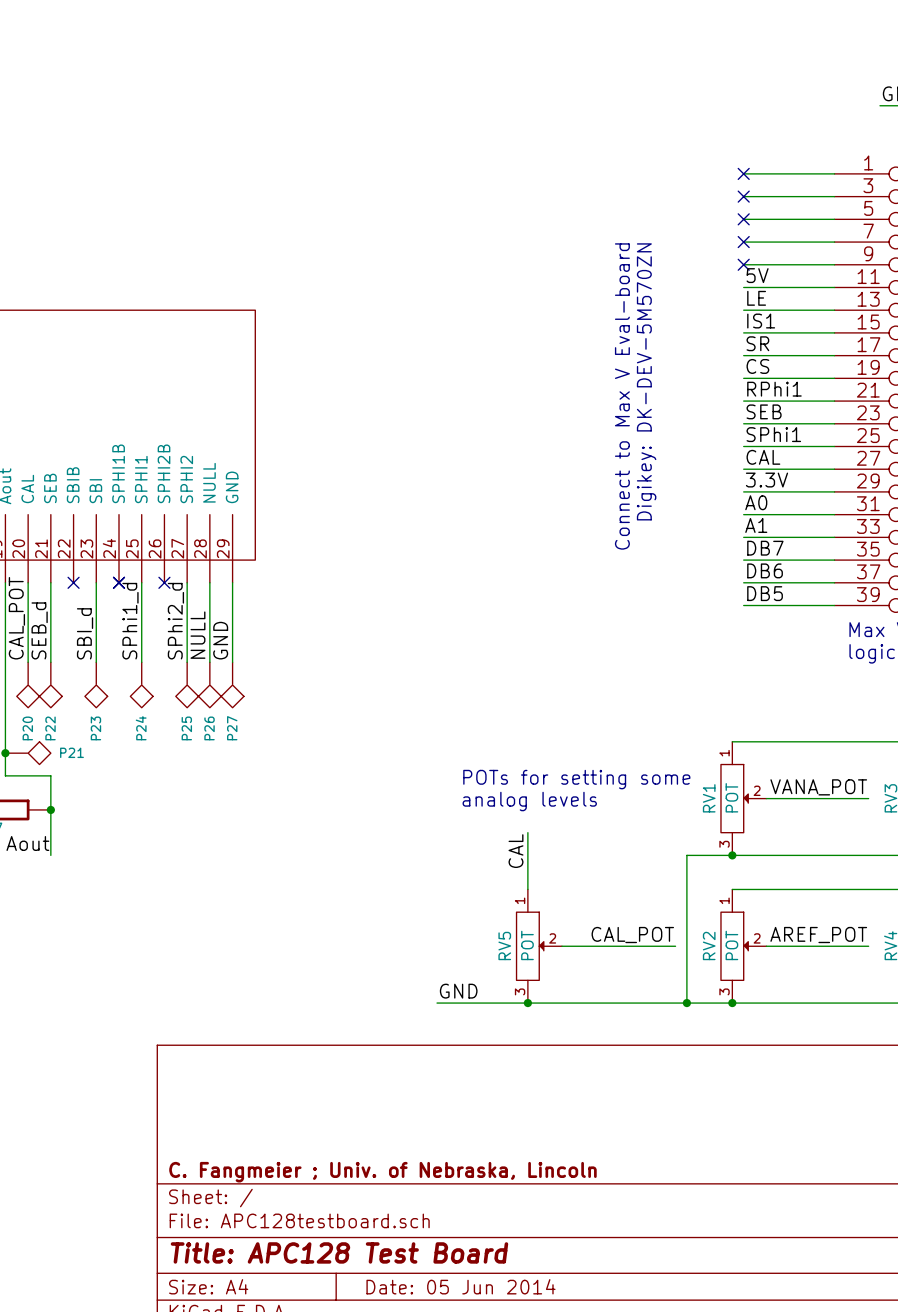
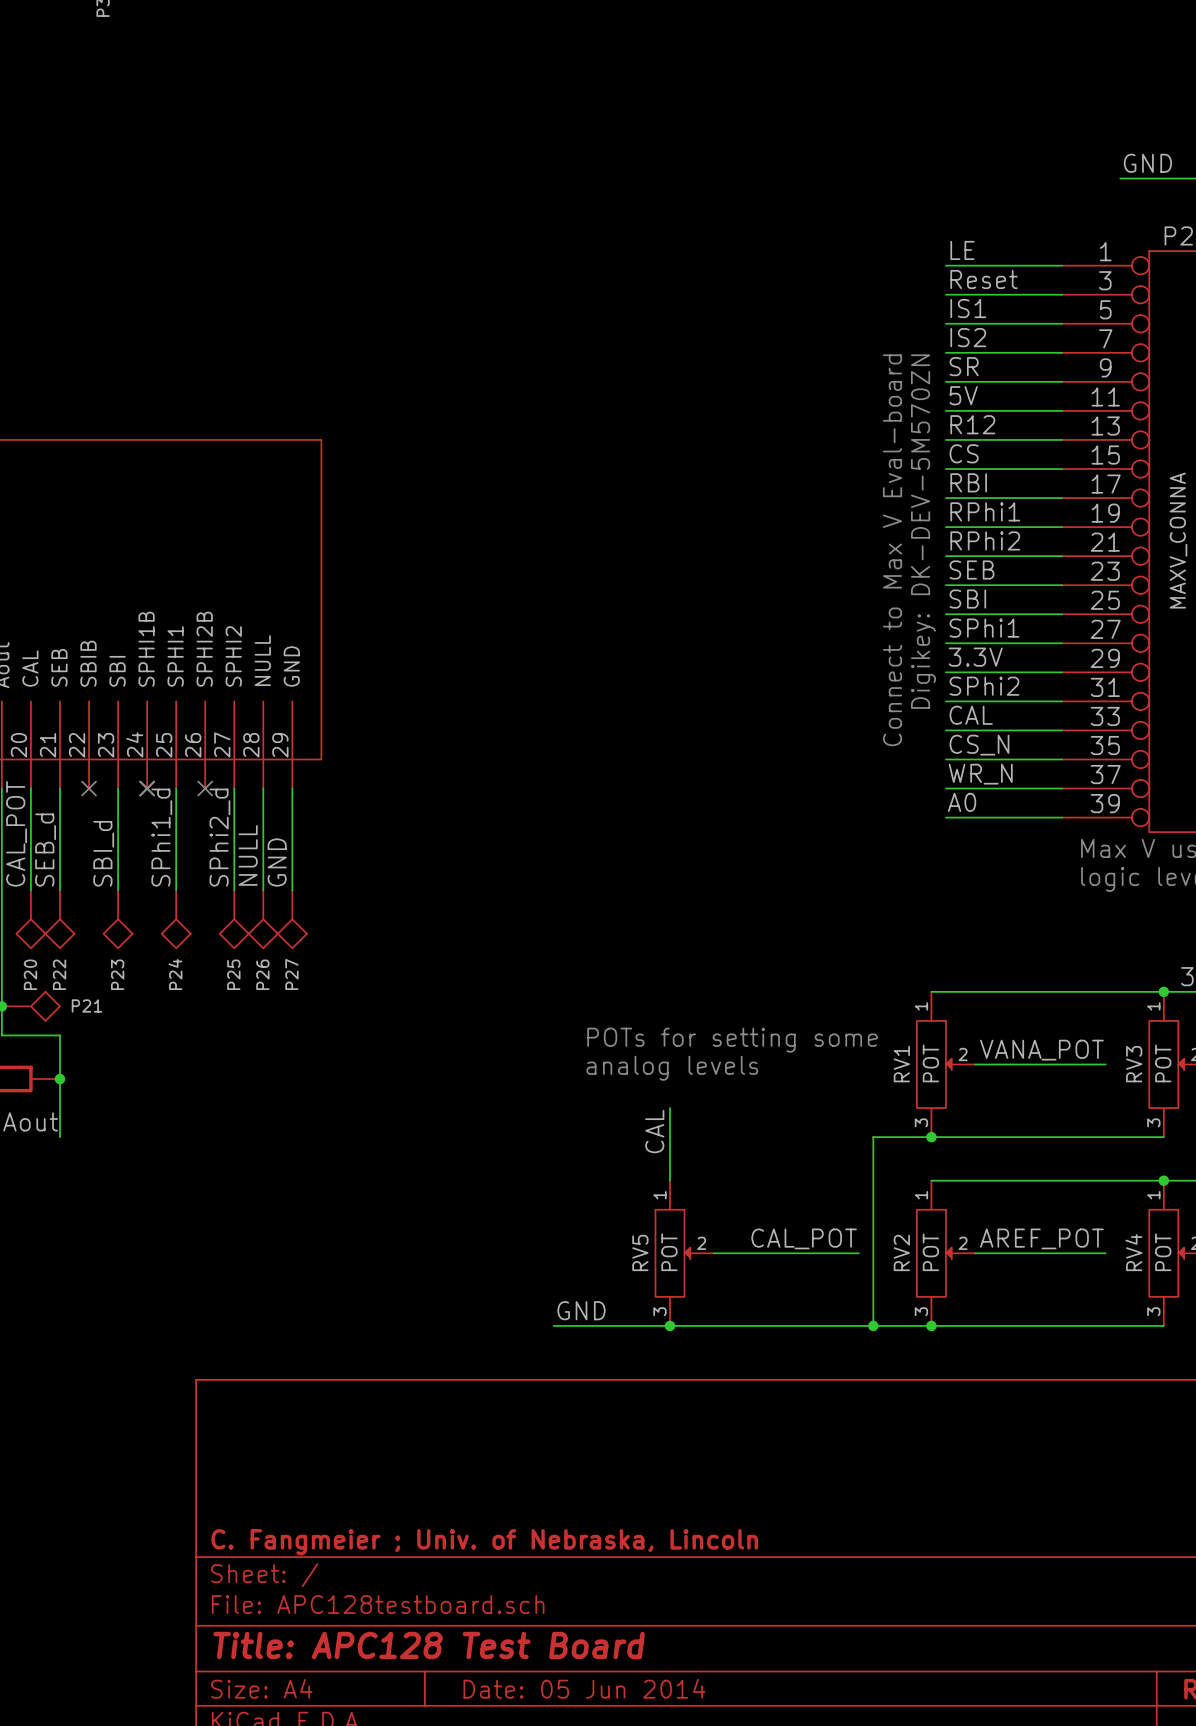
label: none -> LE (962, 250)
no-connect mark: (743, 173) -> none
label: none -> Reset (984, 279)
no-connect mark: (743, 196) -> none
label: none -> IS1 (968, 308)
no-connect mark: (743, 219) -> none
label: none -> IS2 (968, 337)
no-connect mark: (743, 242) -> none
label: none -> SR (964, 366)
no-connect mark: (743, 264) -> none
label: LE (756, 298) -> R12 (972, 424)
label: IS1 (761, 321) -> CS (964, 453)
label: SR (757, 343) -> RBI (968, 482)
label: CS (757, 366) -> RPhi1 (985, 511)
text position: Digikey: DK-DEV-5M570ZN (646, 381) -> Digikey: DK-DEV-5M570ZN (923, 531)
label: RPhi1 (774, 389) -> RPhi2 (985, 540)
text position: Connect to Max V Eval-board (622, 396) -> Connect to Max V Eval-board (892, 550)
label: SPhi1 (773, 434) -> SBI (967, 599)
label: CAL (763, 457) -> SPhi1 (984, 628)
label: A0 (756, 502) -> SPhi2 (984, 686)
label: A1 (756, 525) -> CAL (971, 715)
label: DB7 (765, 548) -> CS_N (979, 745)
label: DB6 (765, 570) -> WR_N (980, 774)
label: DB5 (765, 593) -> A0 (962, 802)

